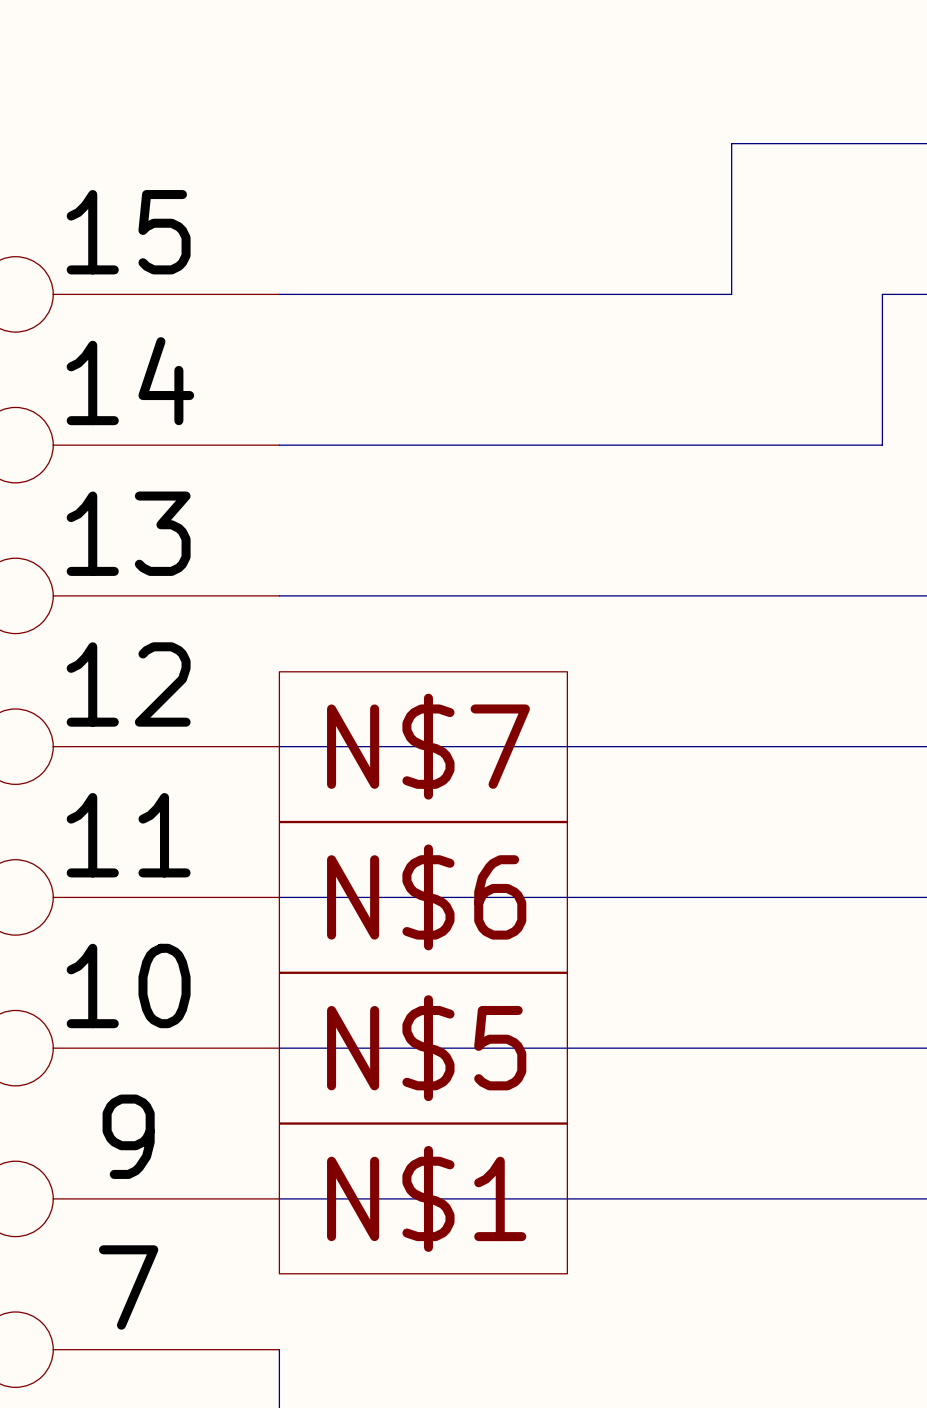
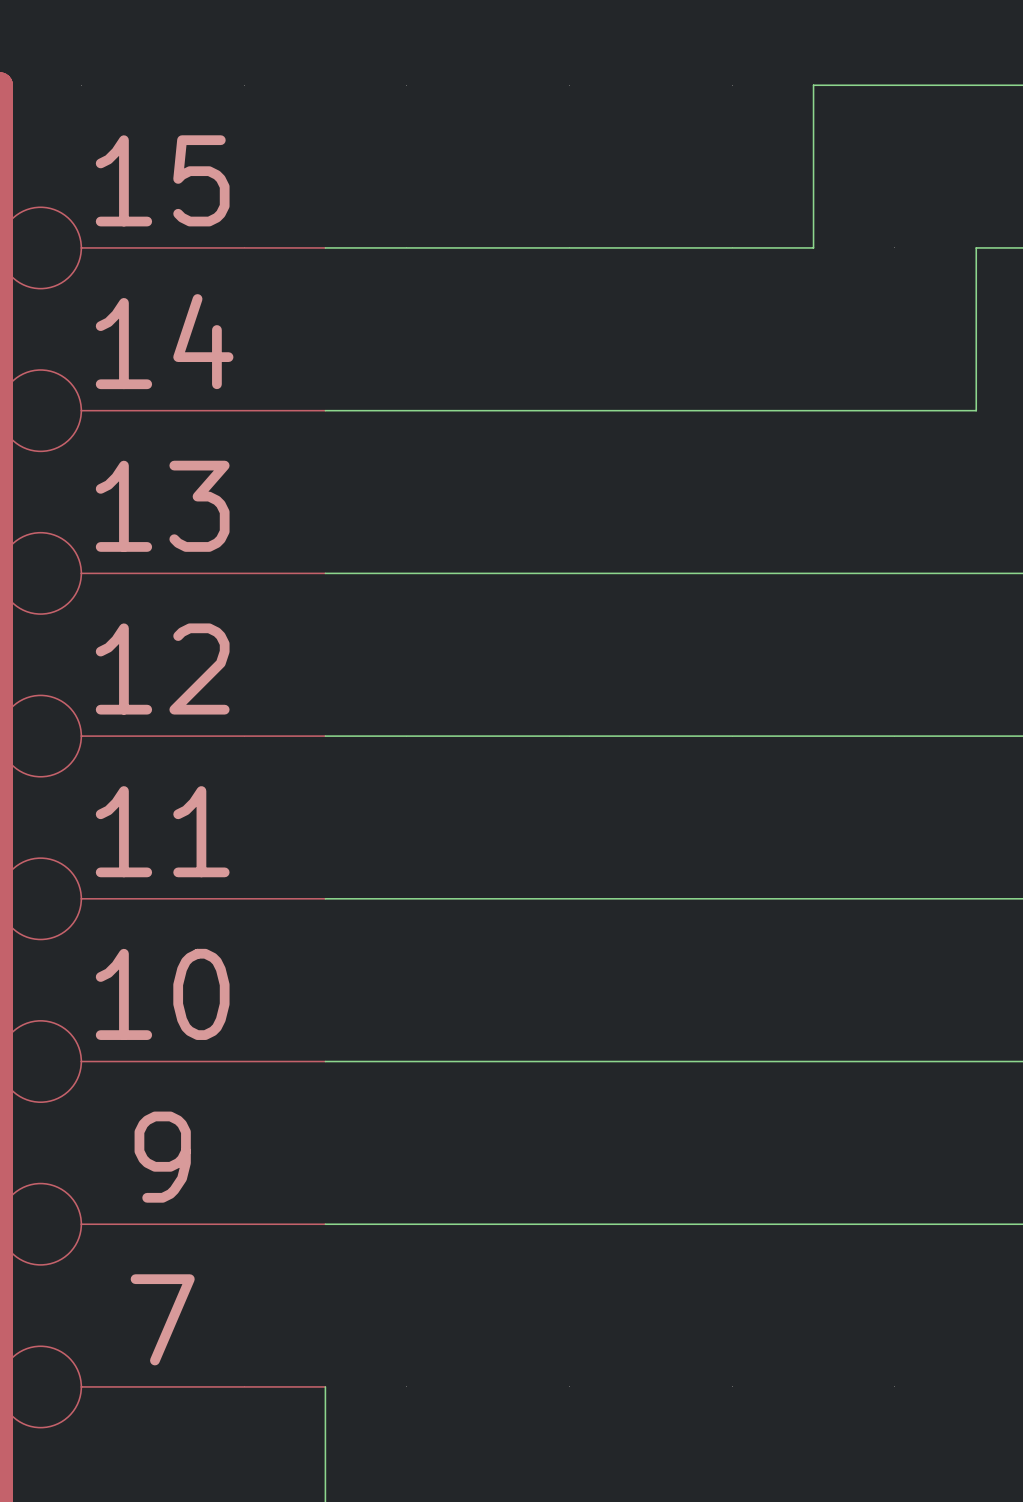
global label: N$7 (428, 746) -> none
global label: N$6 (426, 897) -> none
global label: N$5 (426, 1048) -> none
global label: N$1 (426, 1198) -> none

